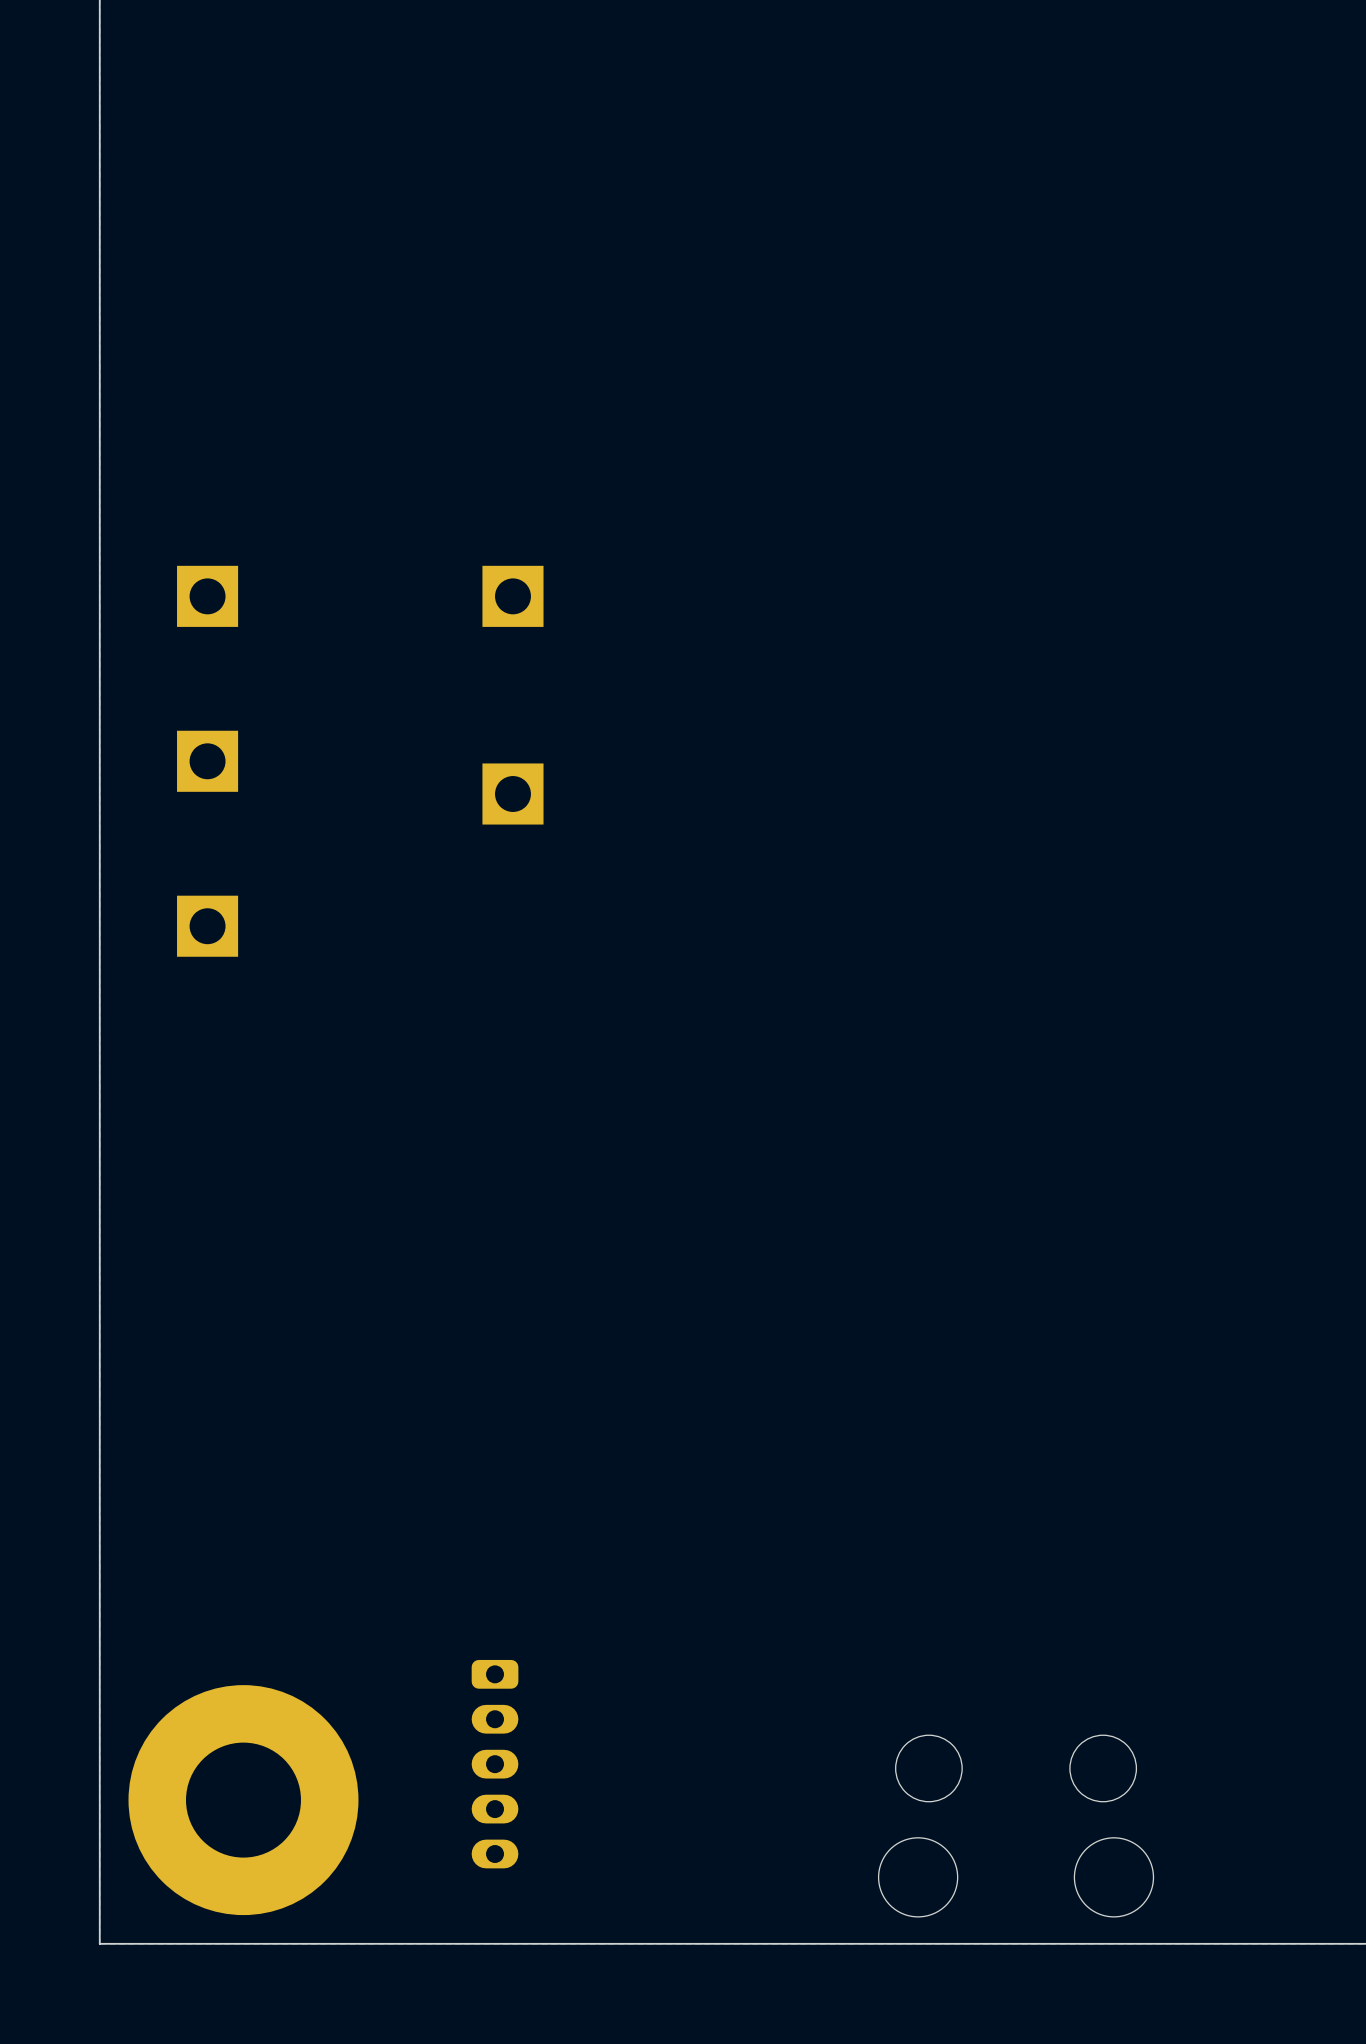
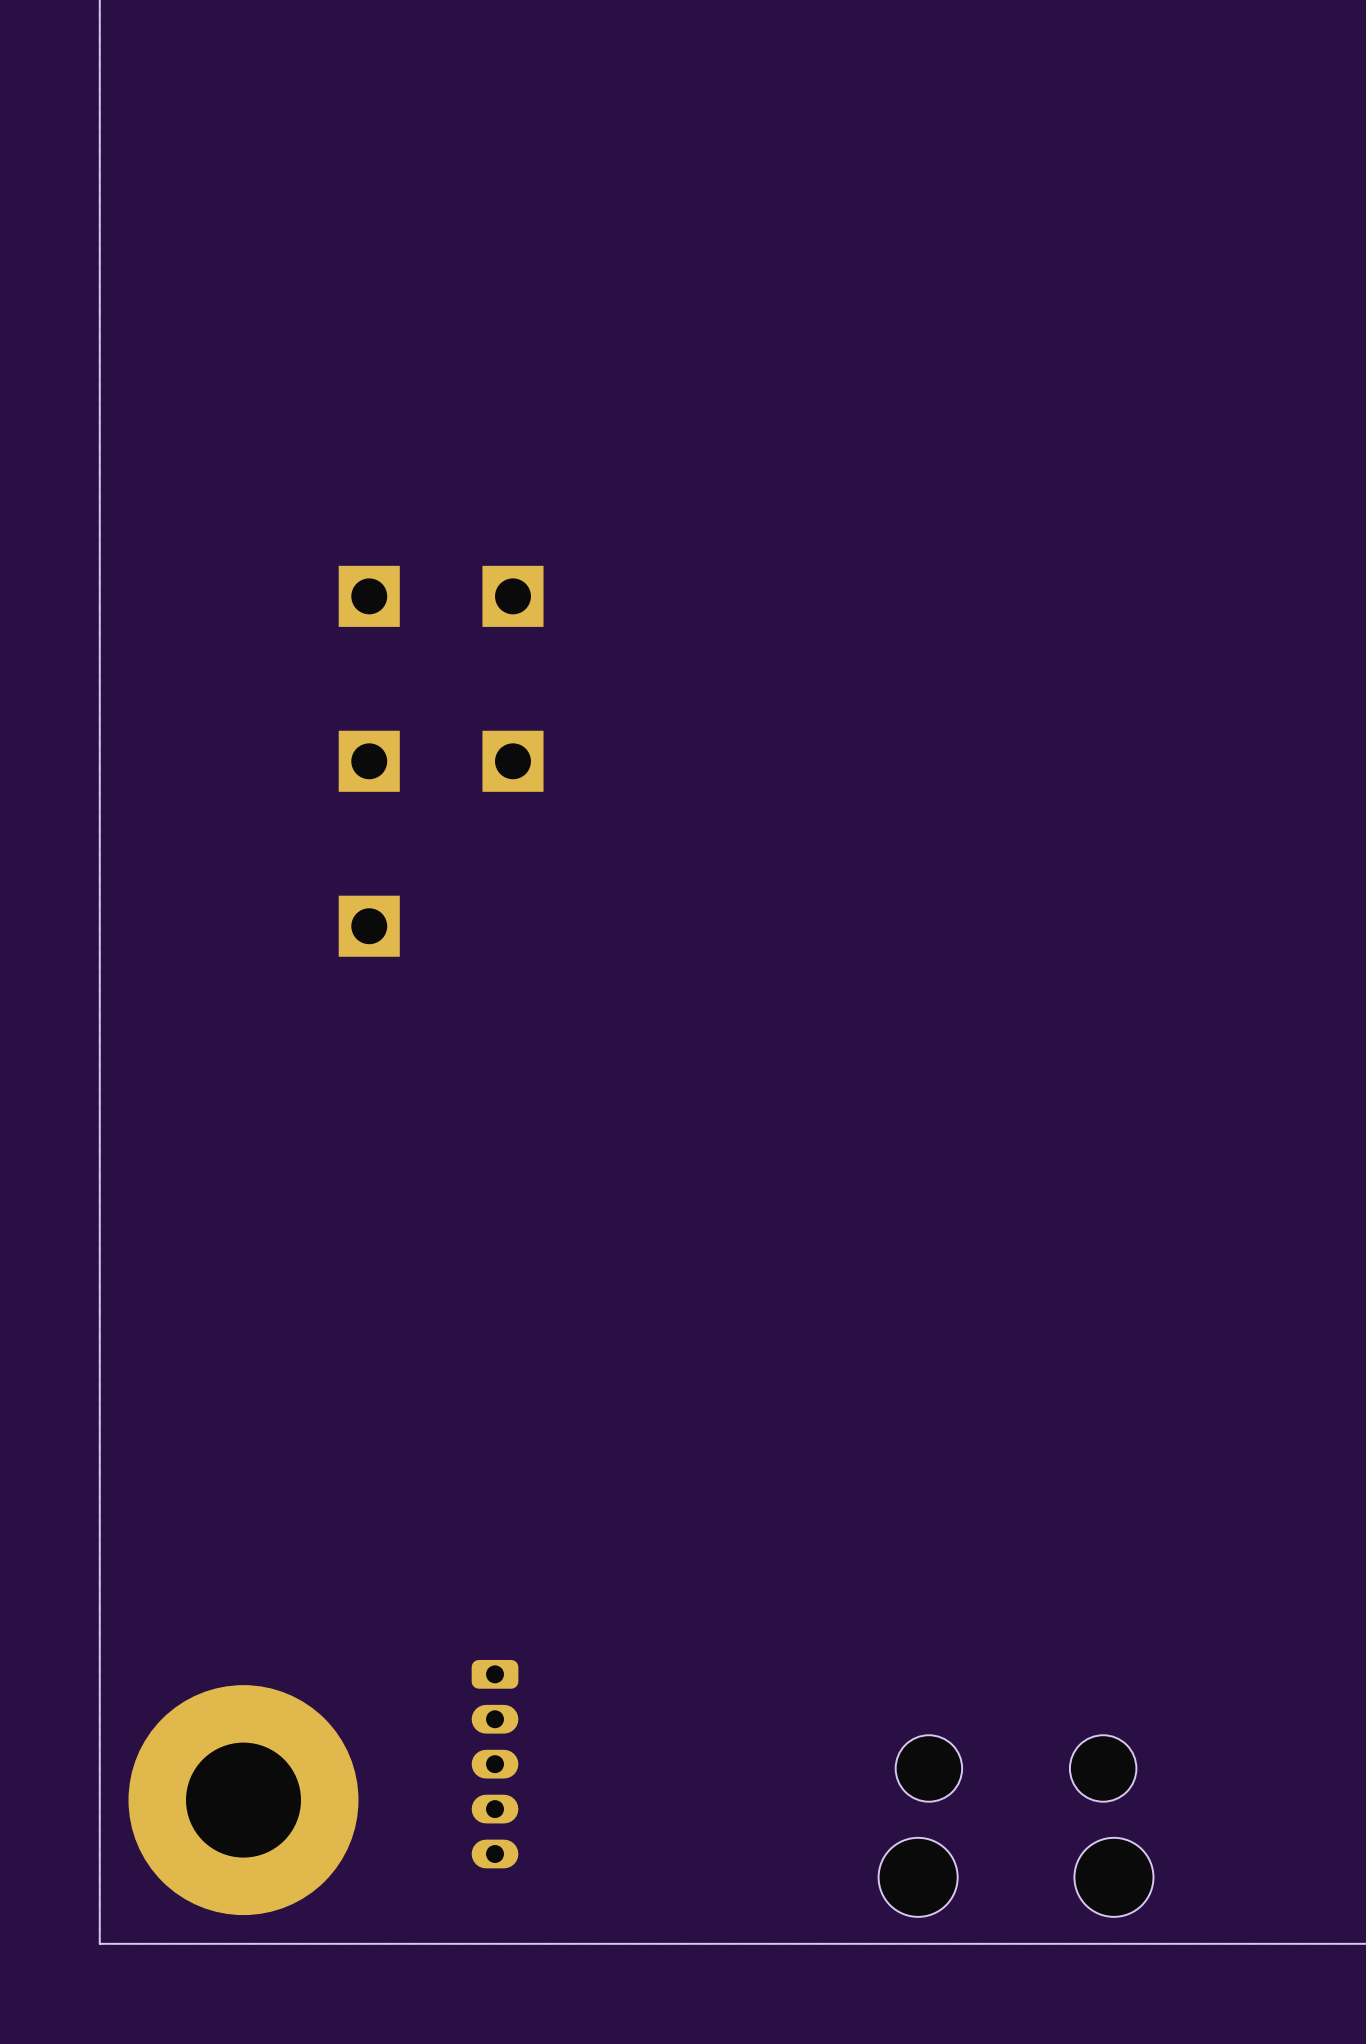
part: (207, 596) -> none
part: none -> (369, 596)
part: (207, 761) -> none
part: none -> (369, 761)
part position: (512, 794) -> (512, 761)
part: (207, 926) -> none
part: none -> (369, 926)

